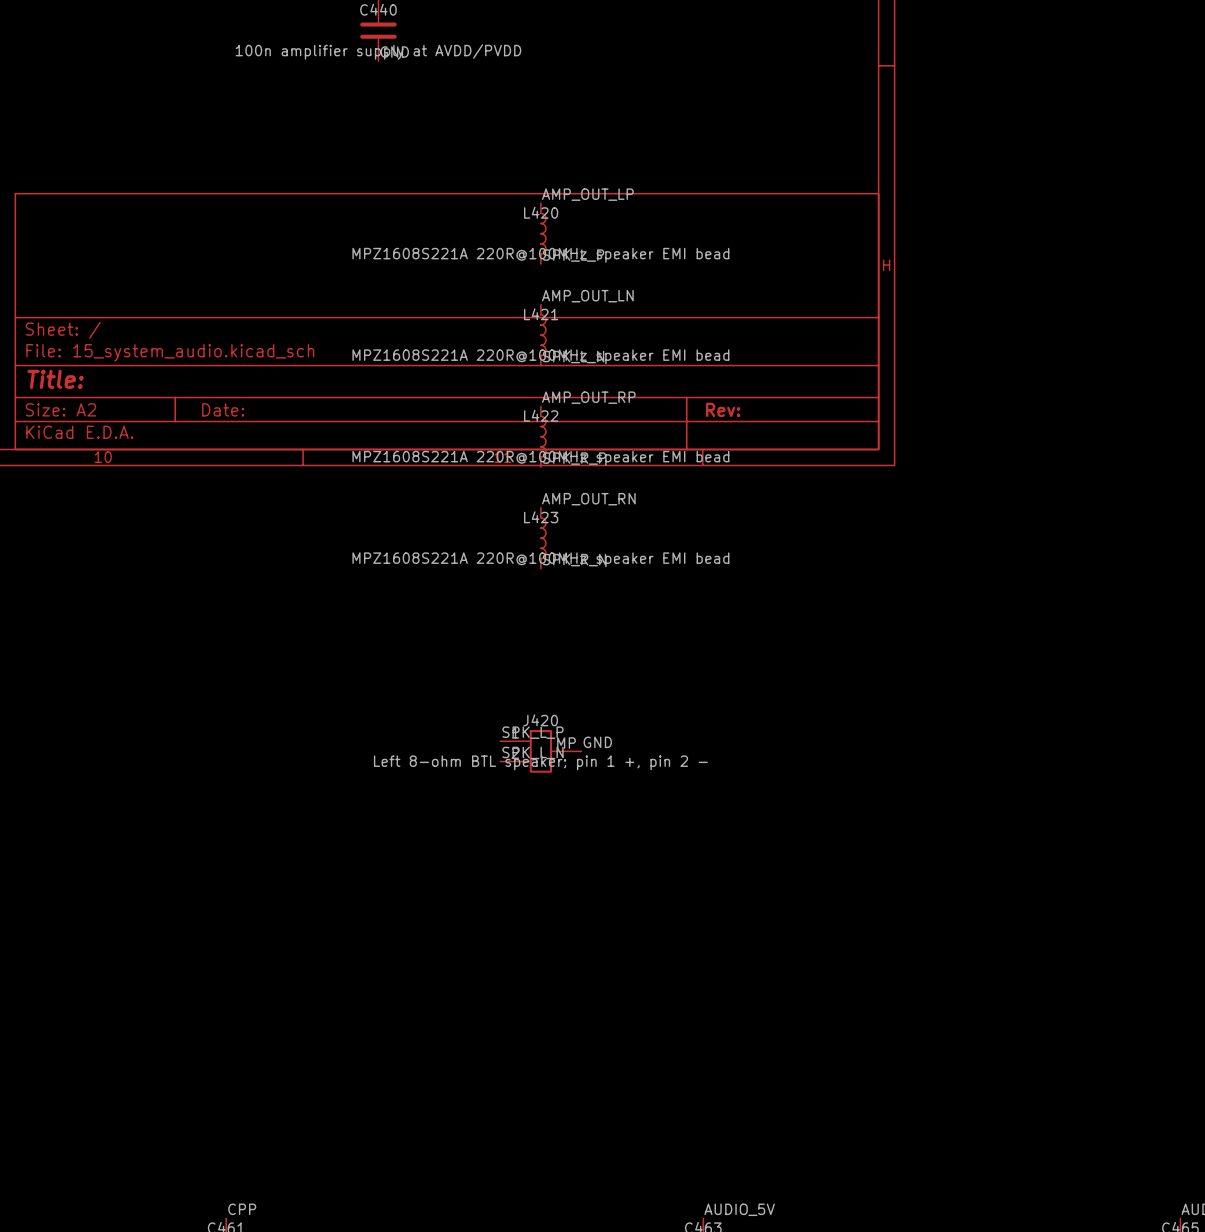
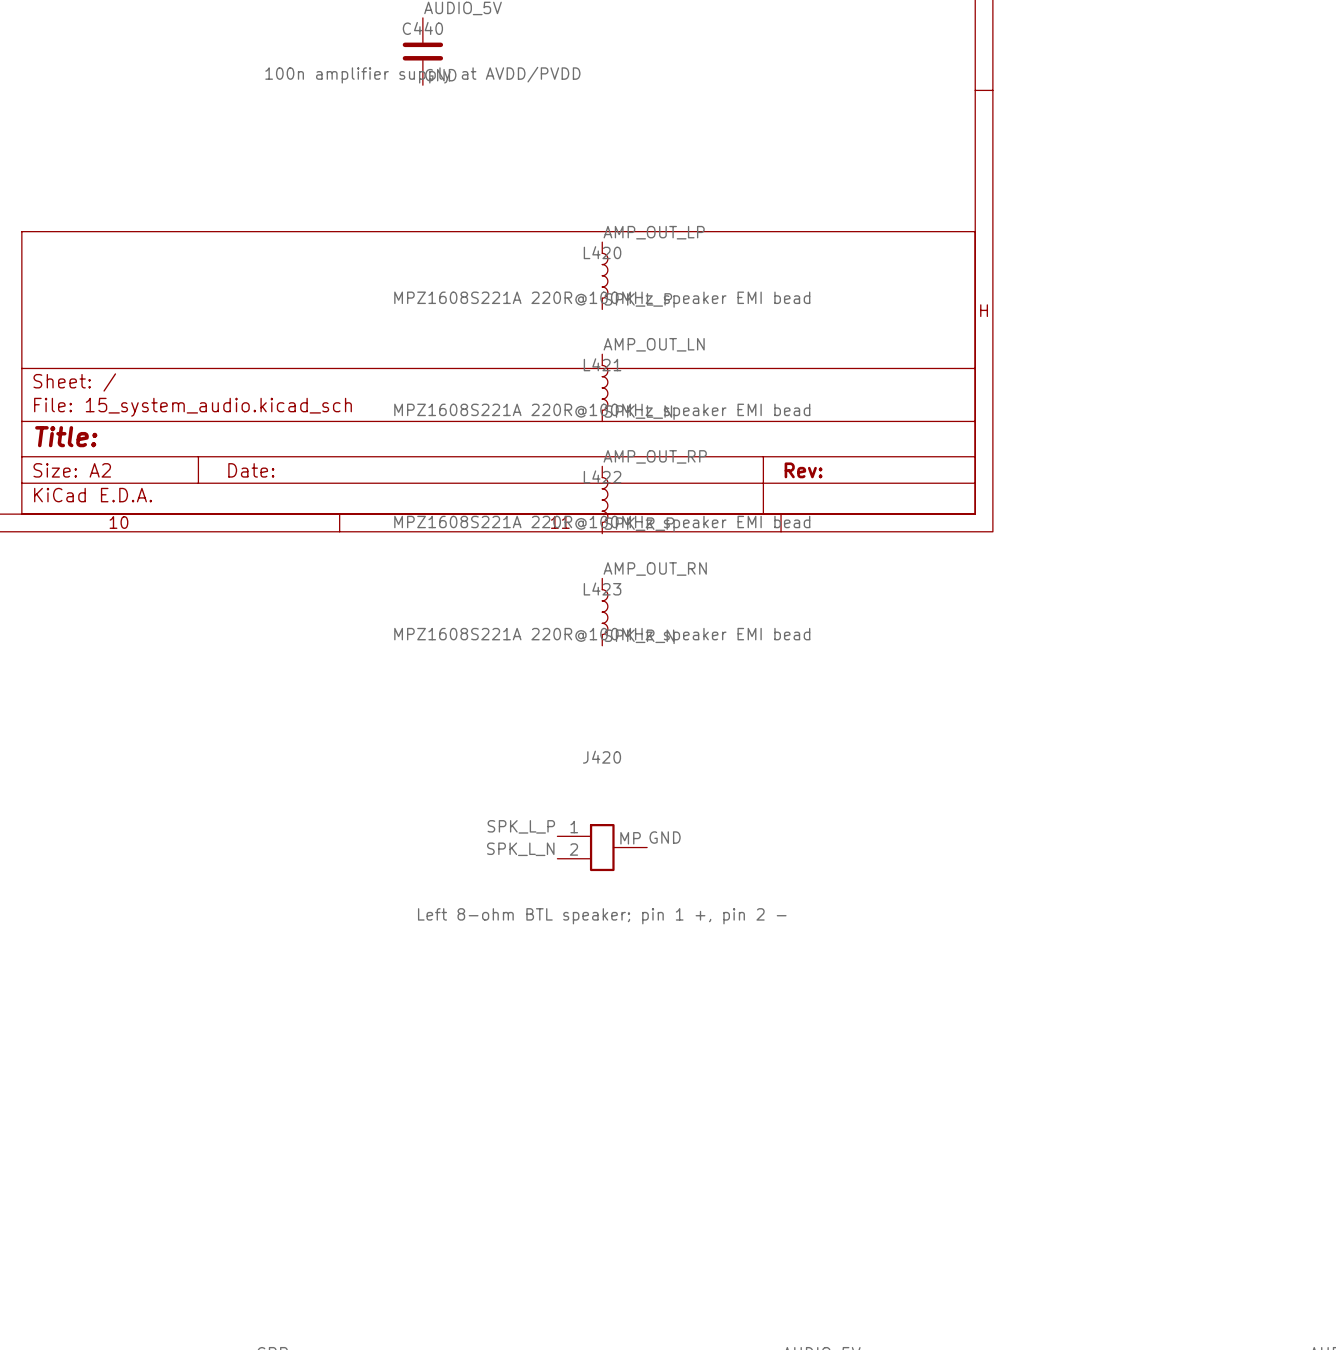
J420 name position: J420 (540, 720) -> J420 (602, 757)
label position: SPK_L_P (532, 732) -> SPK_L_P (521, 826)
label position: SPK_L_N (532, 752) -> SPK_L_N (520, 849)
J420 value position: Left 8-ohm BTL speaker; pin 1 +, pin 2 - (540, 762) -> Left 8-ohm BTL speaker; pin 1 +, pin 2 - (602, 916)

